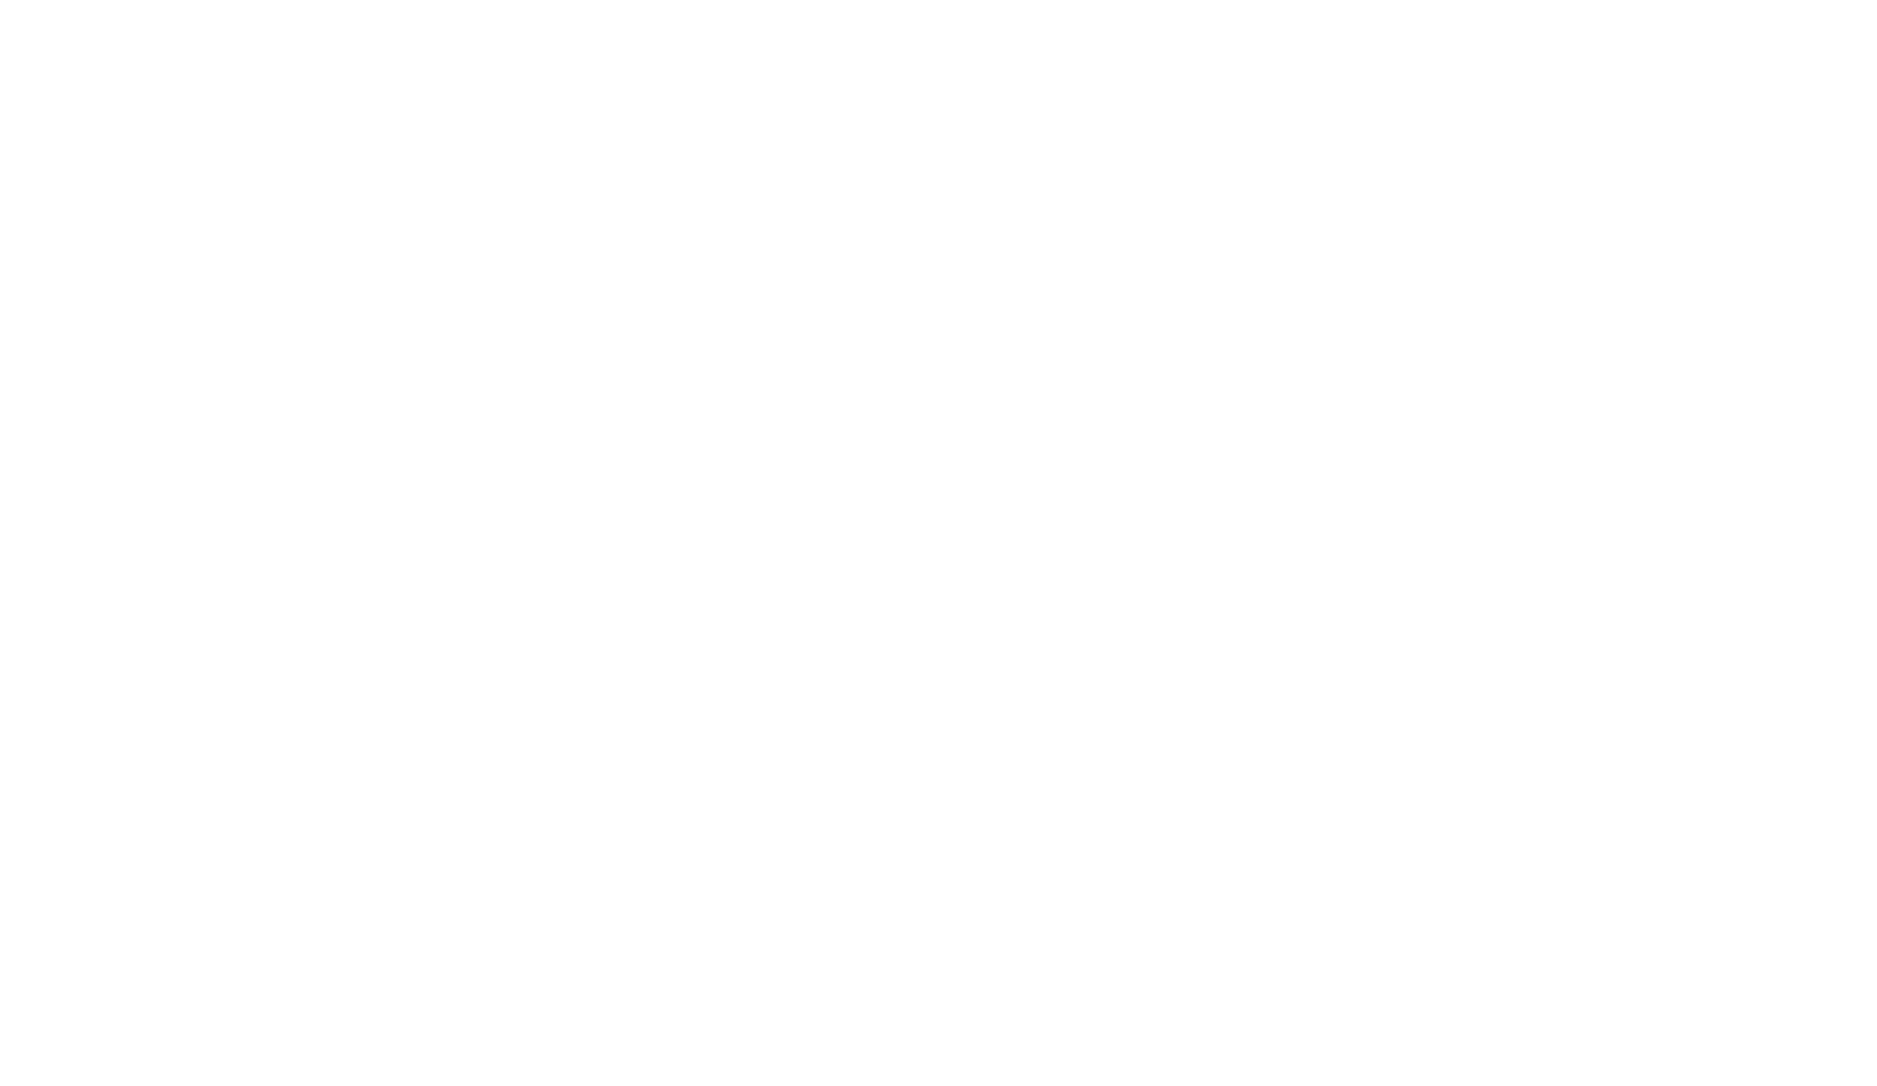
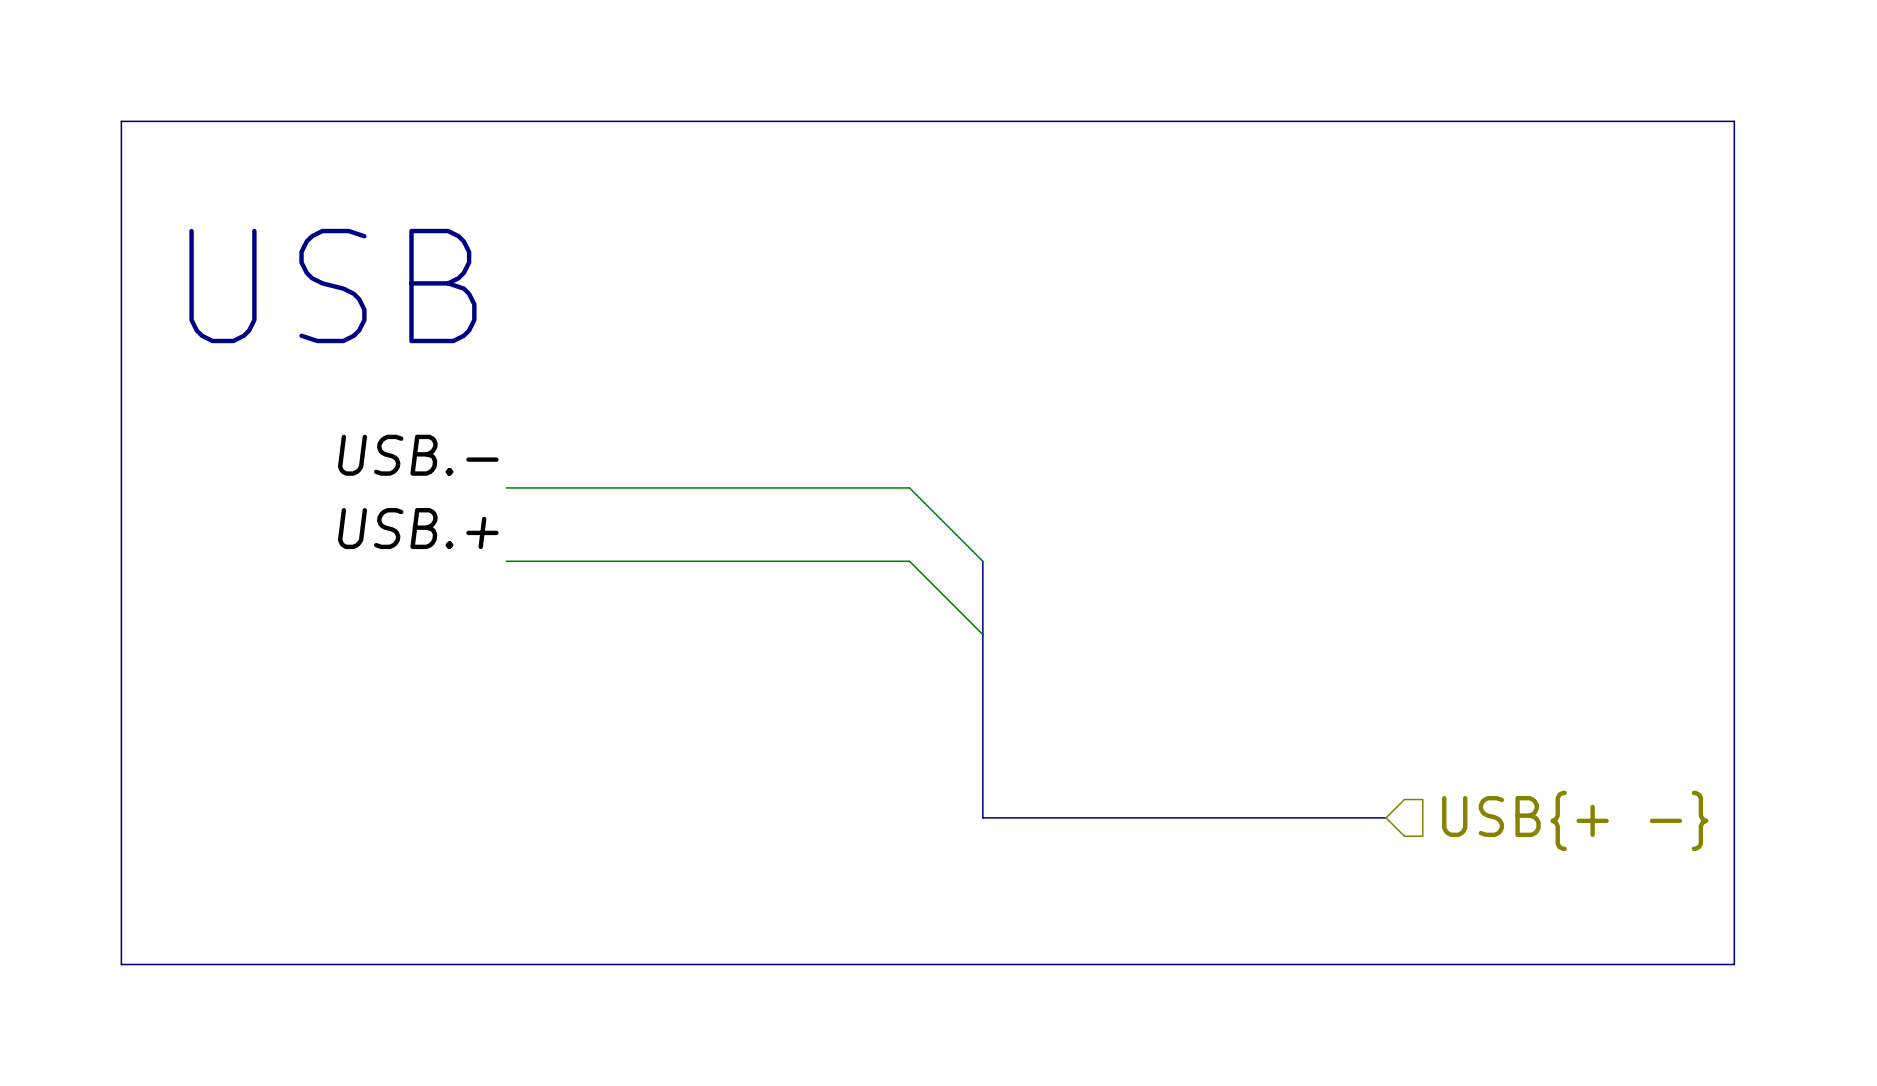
line: none -> (121, 121) (1734, 121) (1734, 964) (121, 964) (121, 121)
text: none -> USB (332, 286)
label: none -> USB.- (418, 455)
wire: none -> (506, 487) (909, 487) (982, 561)
label: none -> USB.+ (418, 528)
wire: none -> (506, 561) (909, 561) (982, 634)
bus: none -> (982, 561) (982, 817) (1386, 817)
hierarchical label: none -> USB{+ -} (1575, 820)

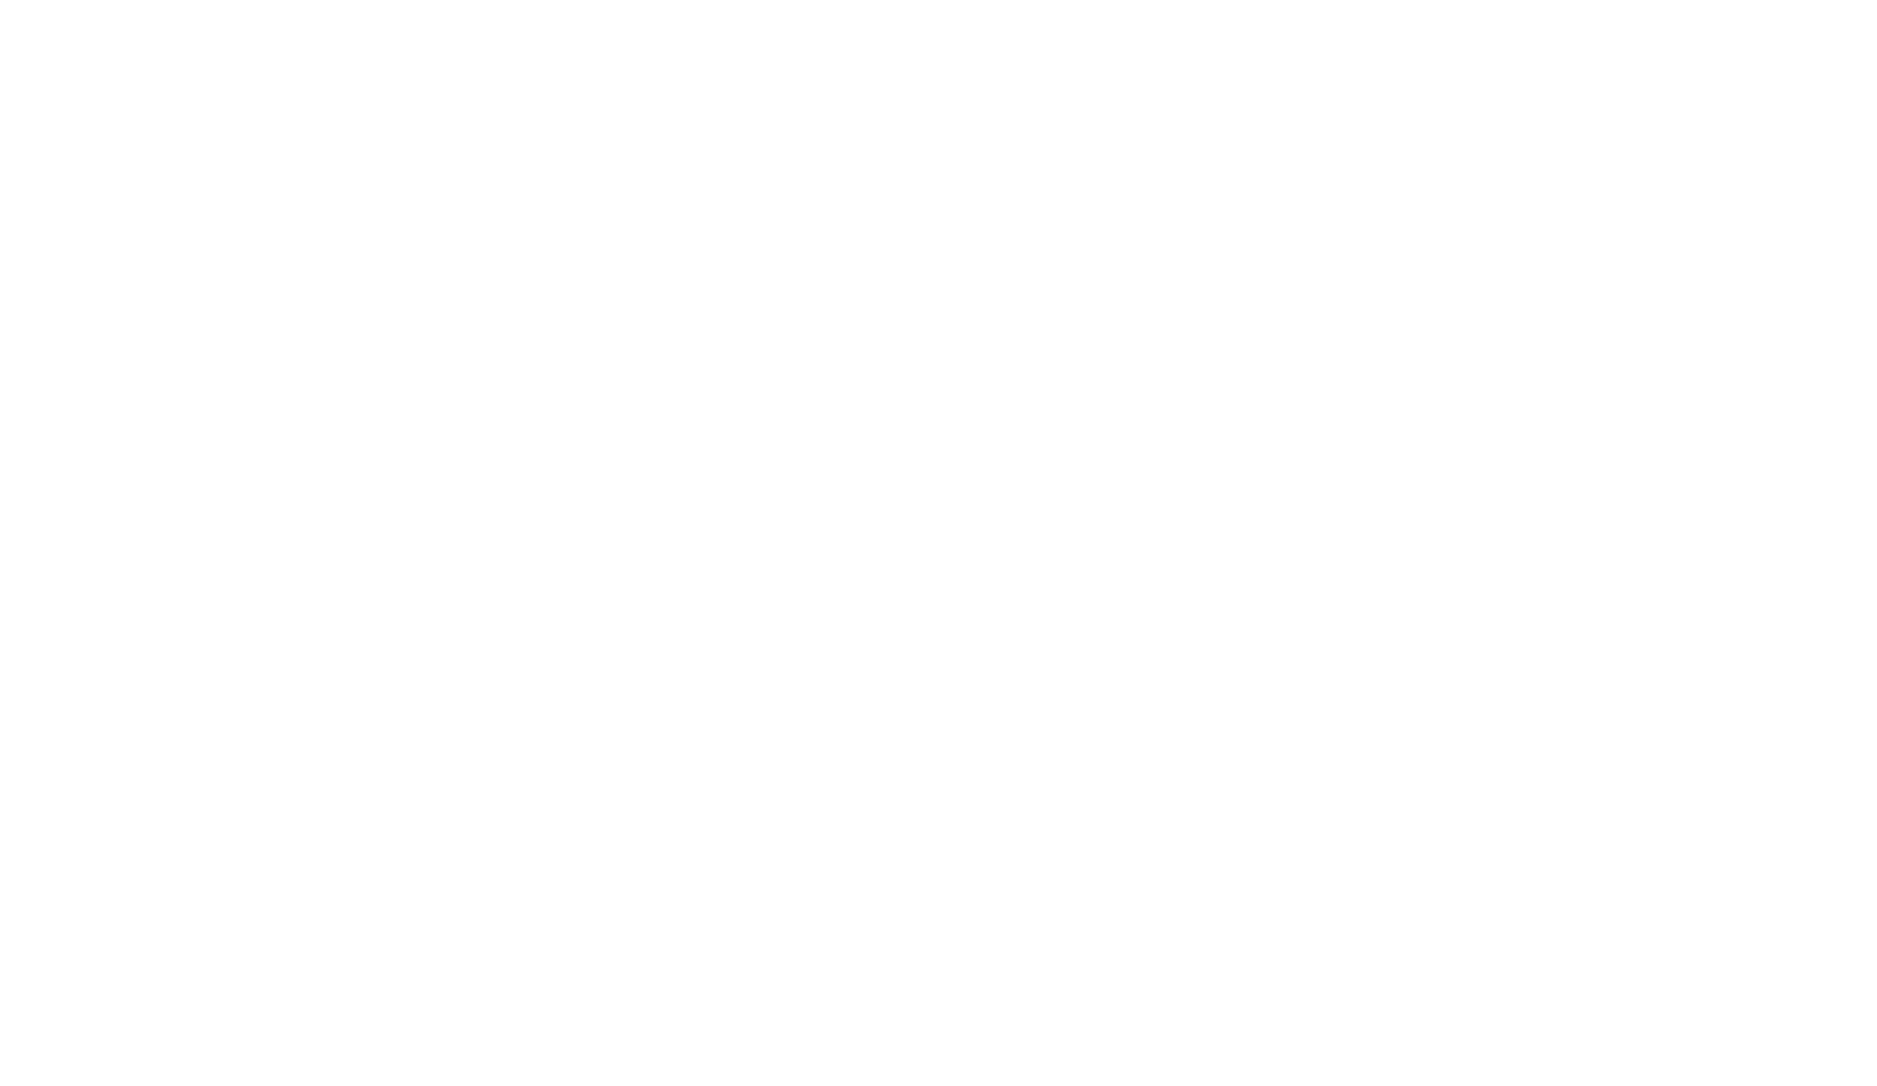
line: (121, 121) (1734, 121) (1734, 964) (121, 964) (121, 121) -> none
text: USB (332, 286) -> none
label: USB.- (418, 455) -> none
wire: (506, 487) (909, 487) (982, 561) -> none
label: USB.+ (418, 528) -> none
wire: (506, 561) (909, 561) (982, 634) -> none
bus: (982, 561) (982, 817) (1386, 817) -> none
hierarchical label: USB{+ -} (1575, 820) -> none

